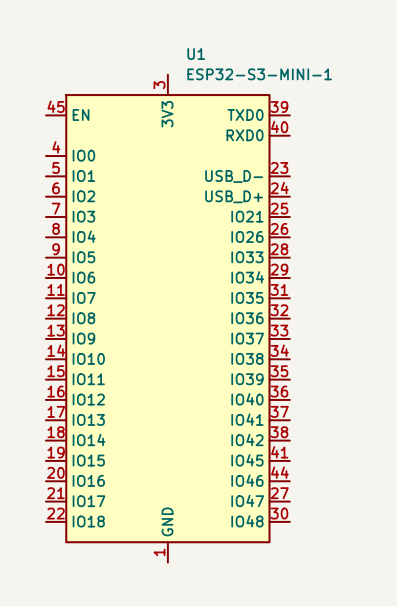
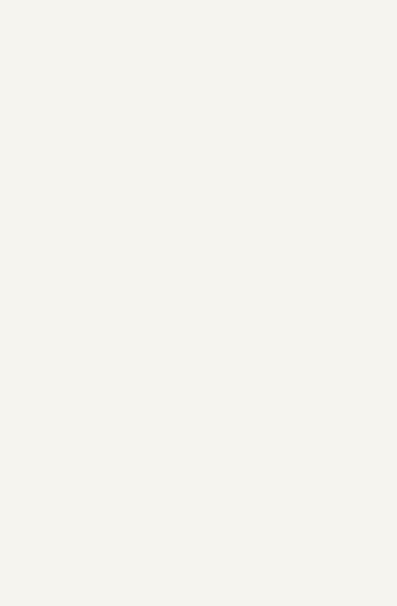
U1: ESP32-S3-MINI-1 (167, 318) -> none

